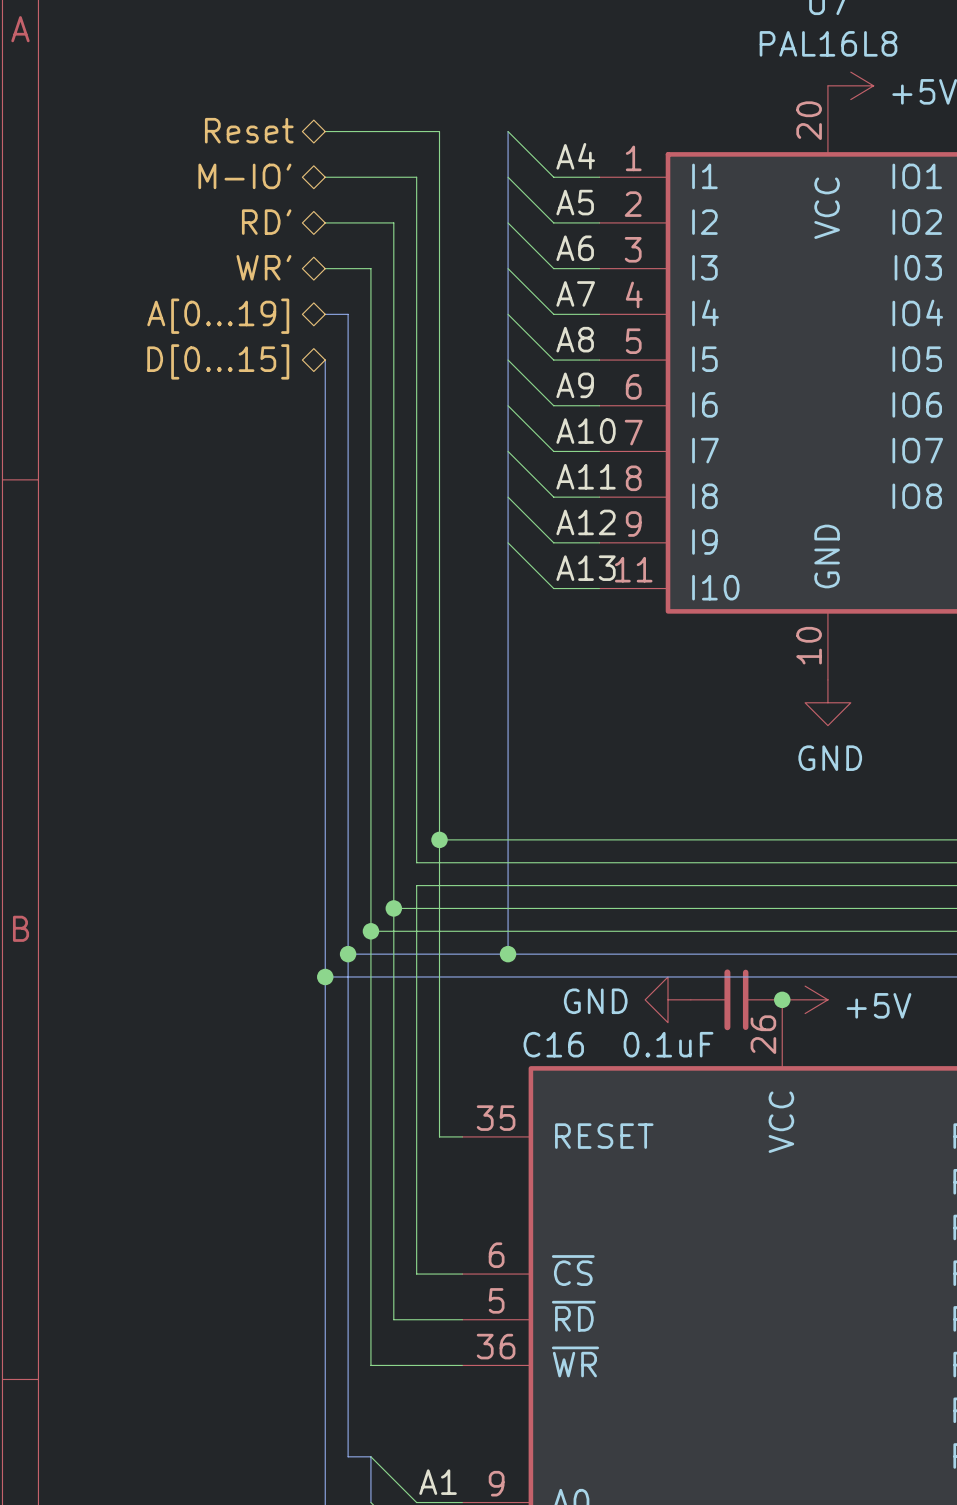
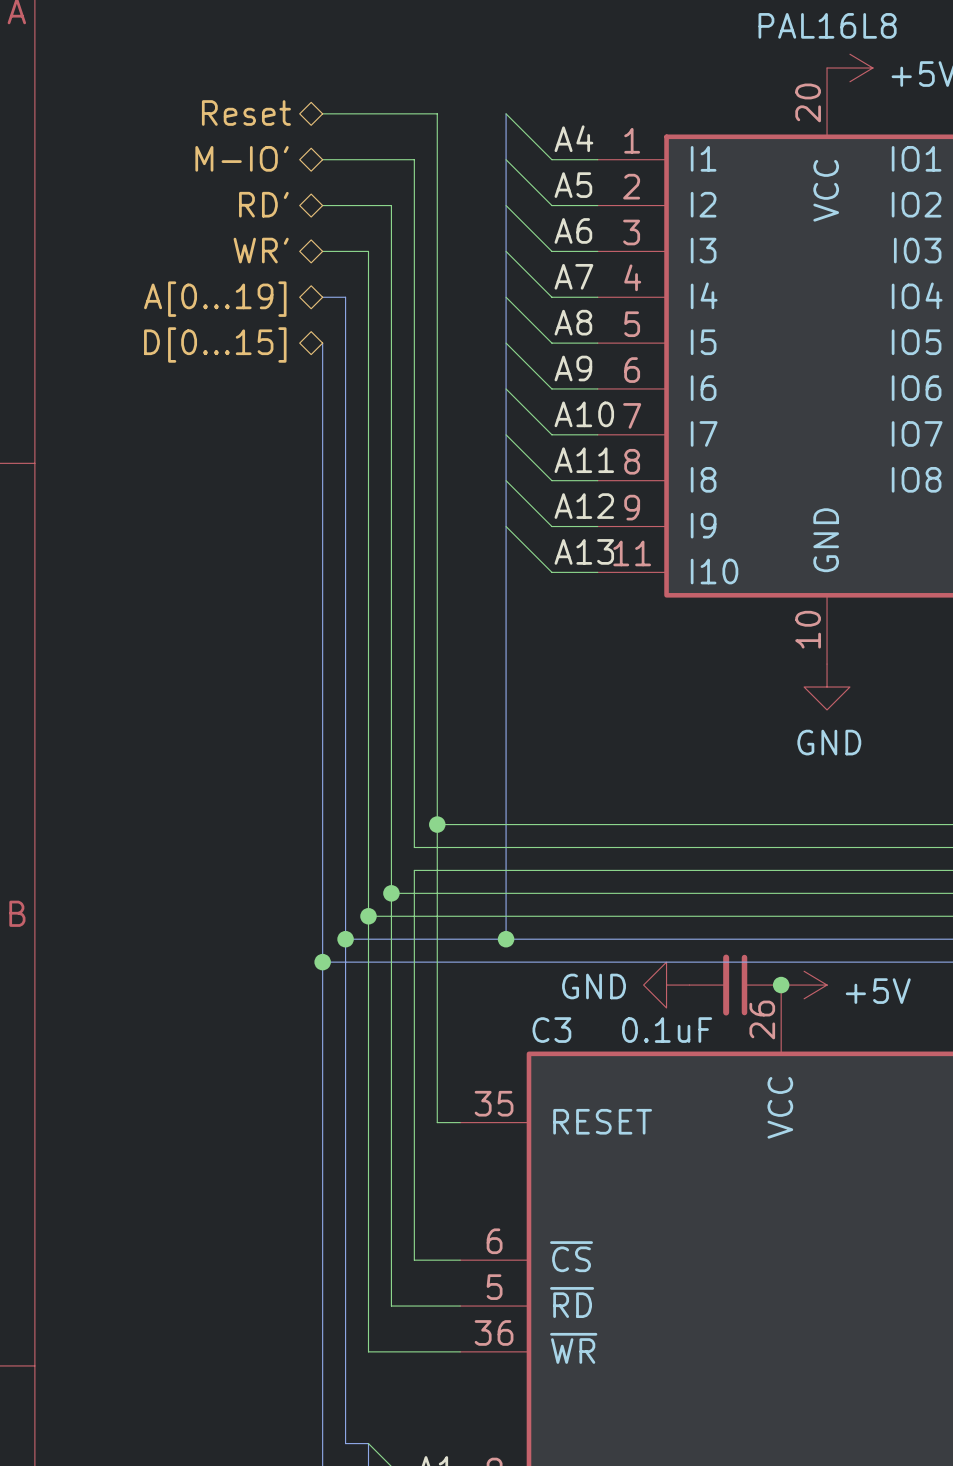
C16 name: C16 (553, 1044) -> C3 (551, 1030)

